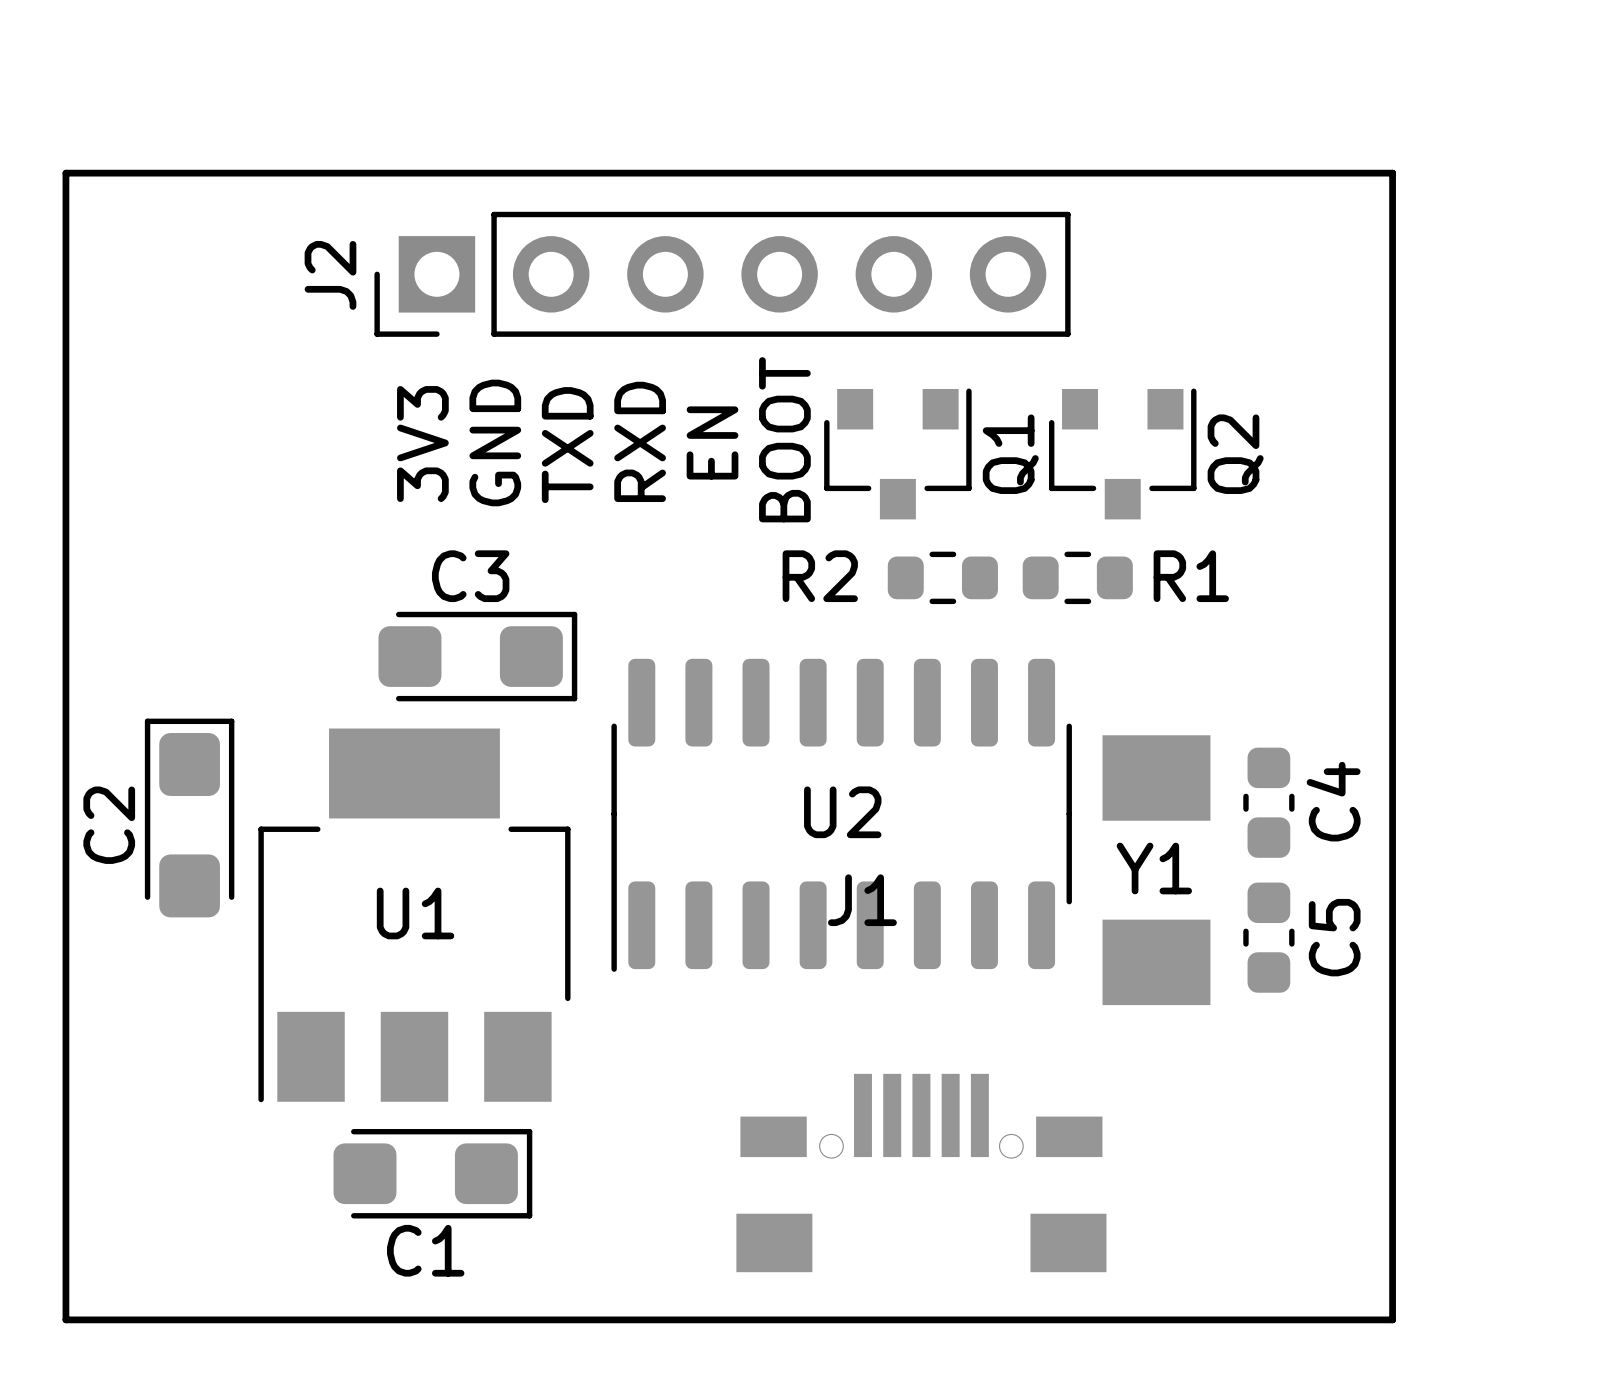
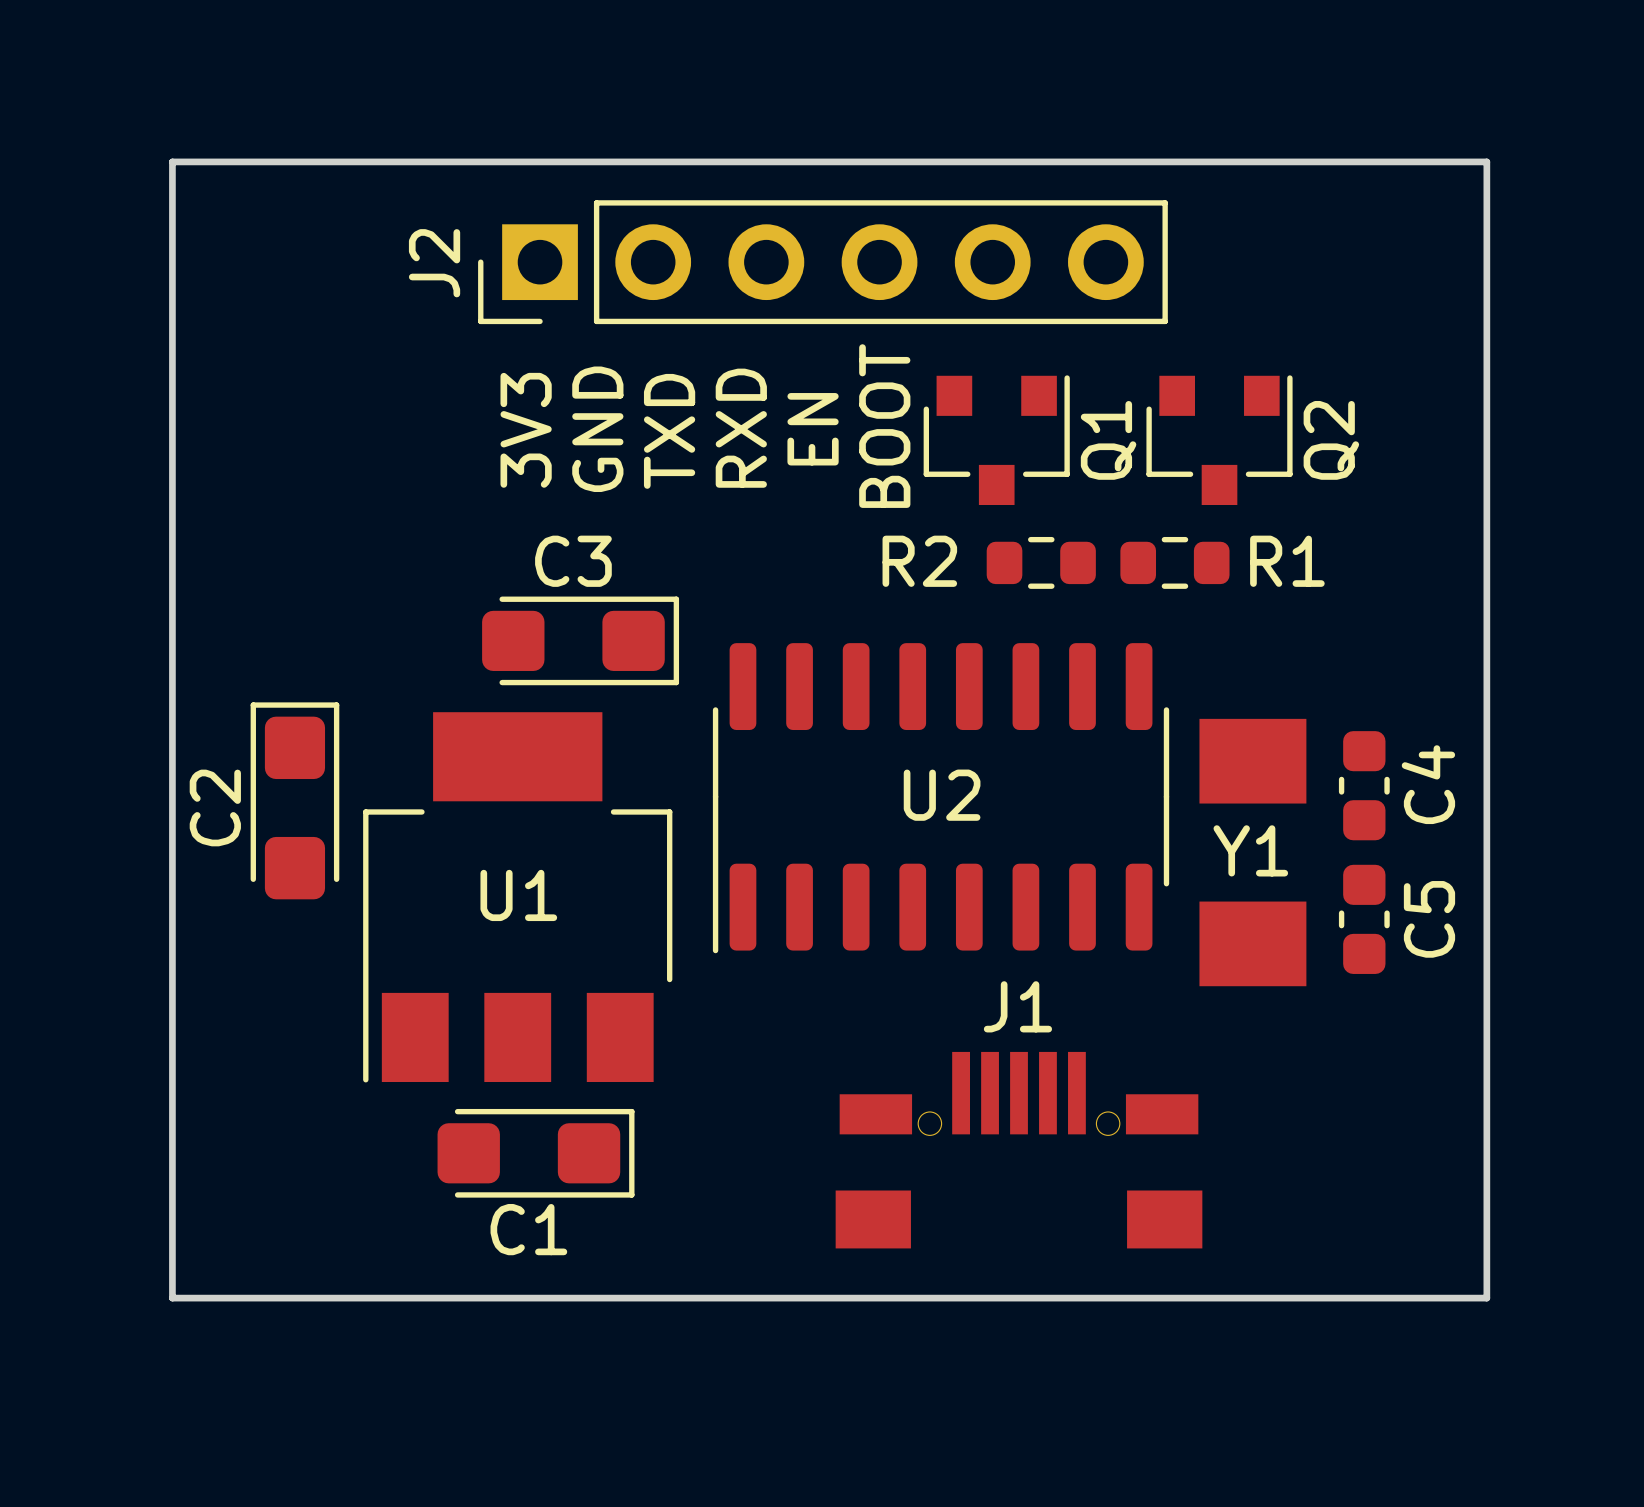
J1 name position: J1 (862, 900) -> J1 (1017, 1006)
J1 footprint: [736, 1073, 1107, 1273] -> [835, 1051, 1203, 1249]

